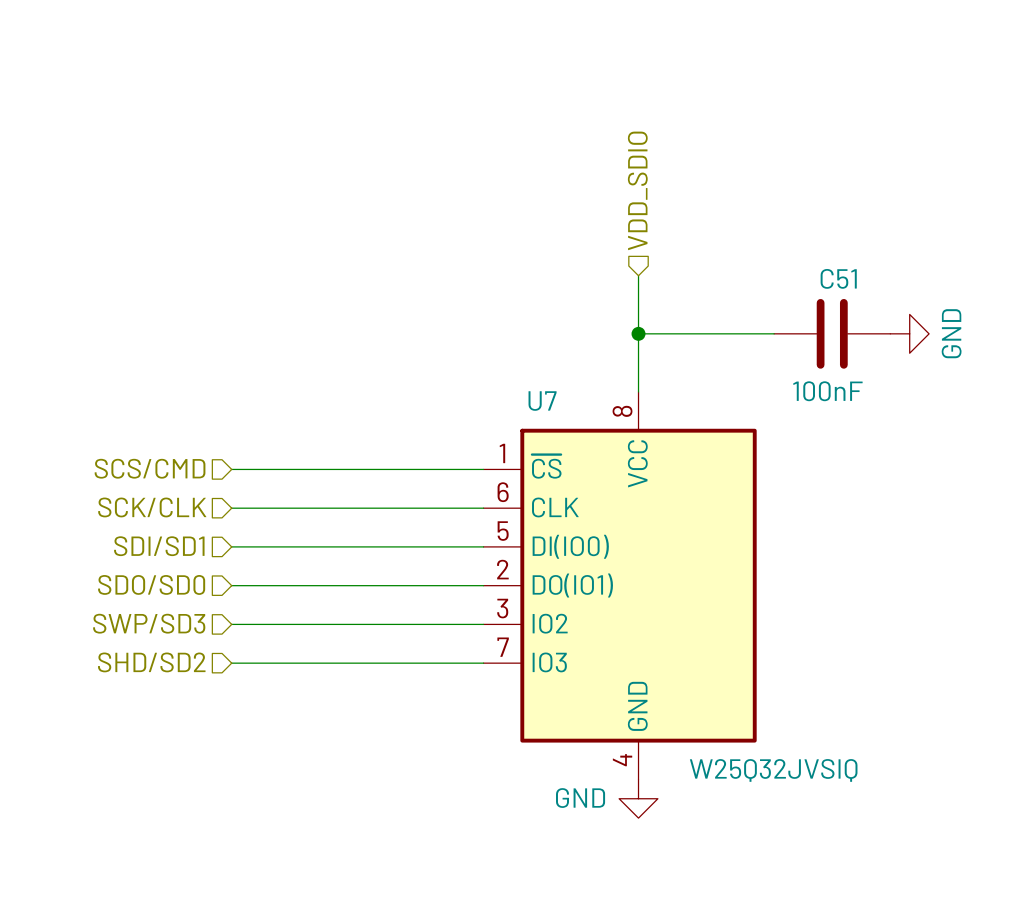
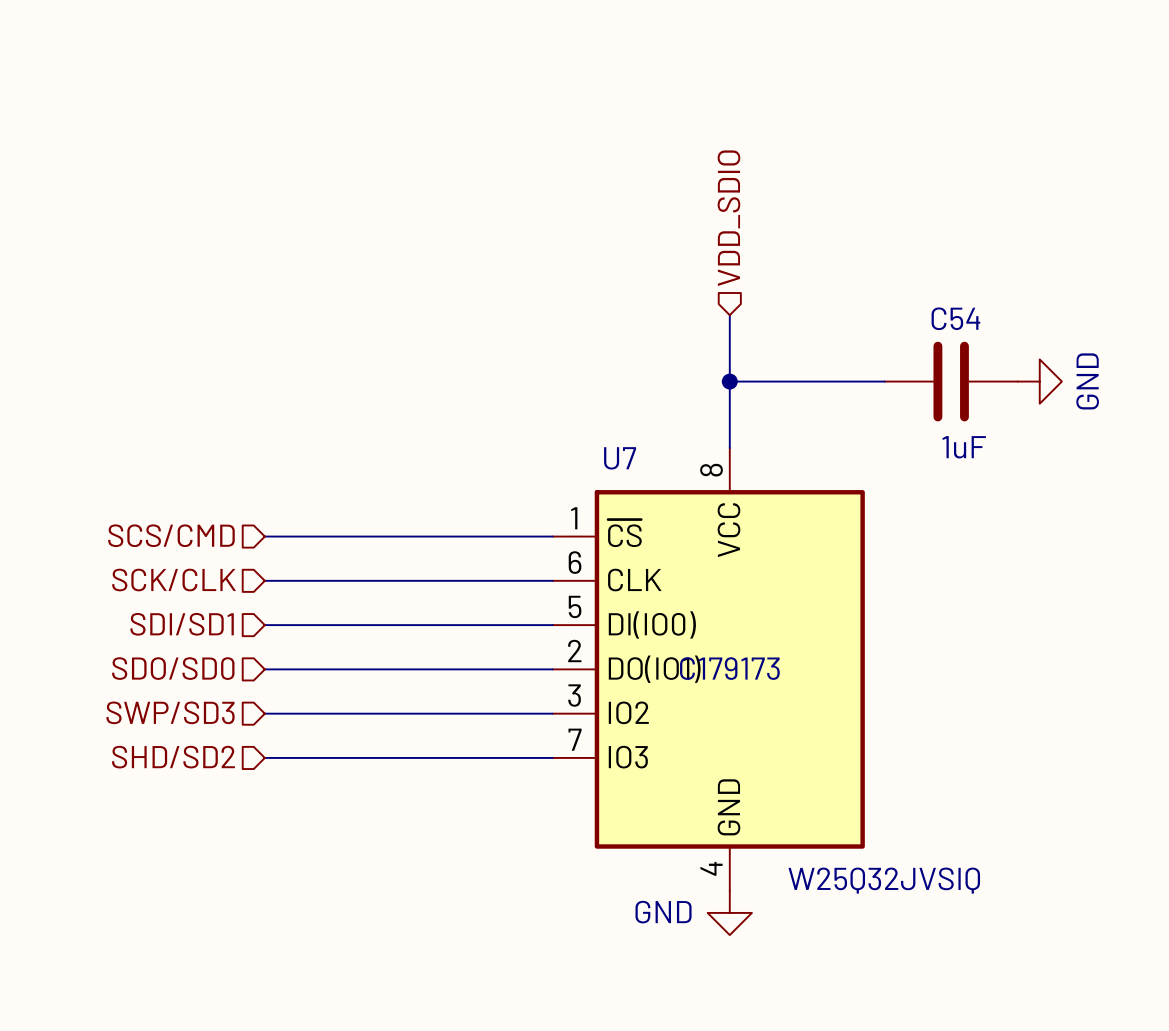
C51 name: C51 (838, 278) -> C54 (955, 318)
C51 value: 100nF (827, 391) -> 1uF (964, 447)
U7 text: none -> C179173 (729, 668)

